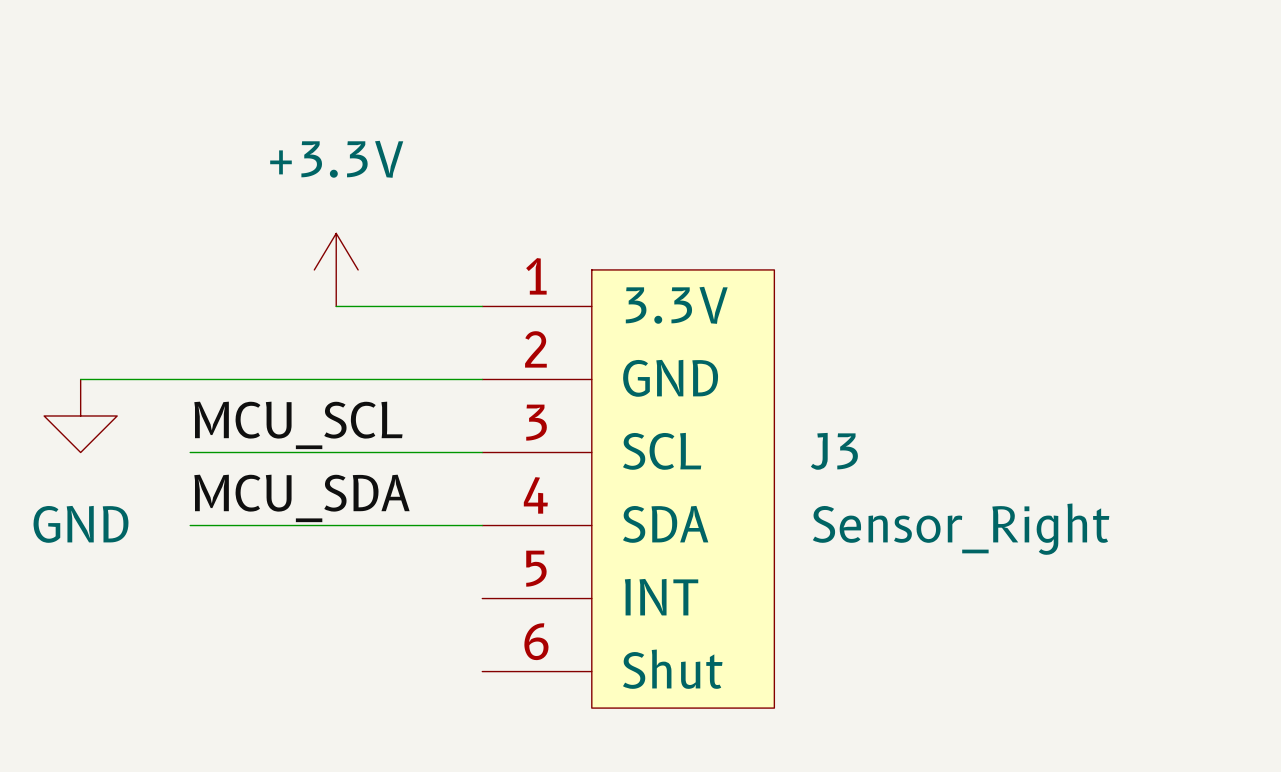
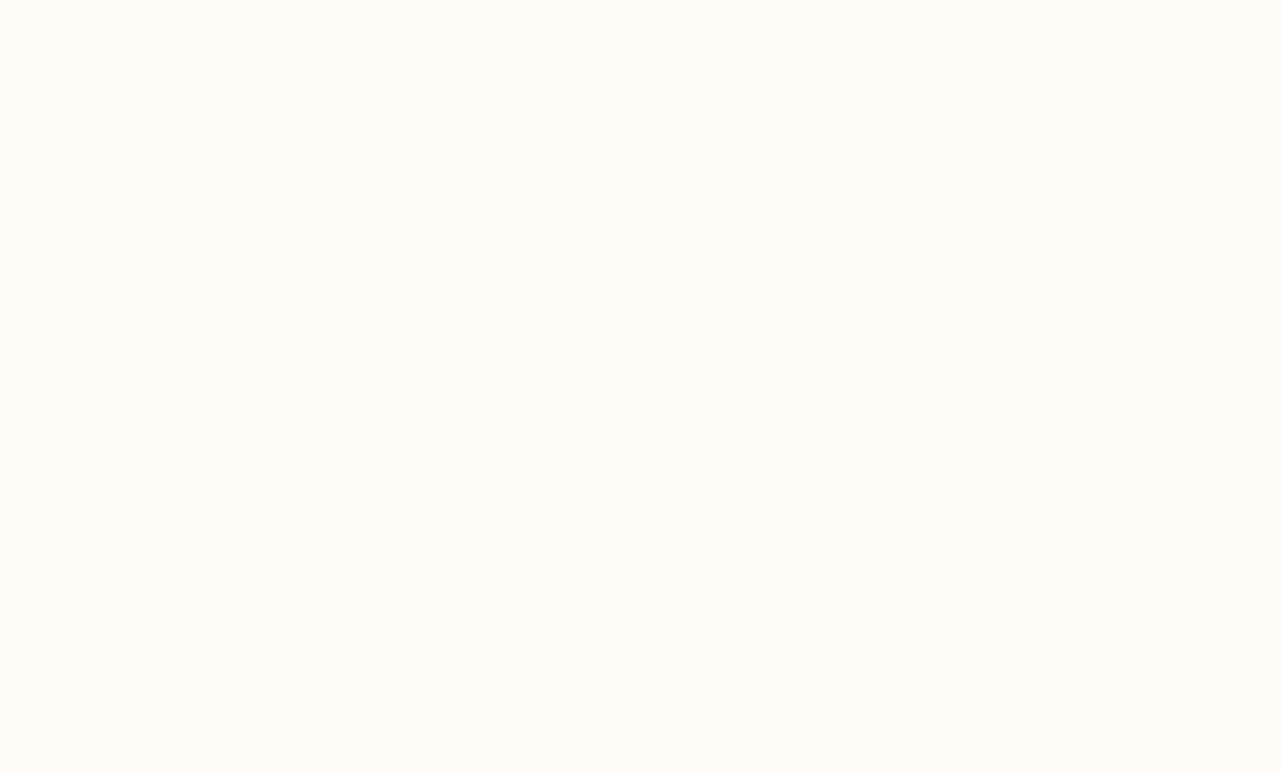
power symbol: +3.3V (336, 269) -> none
wire: (336, 306) (482, 306) -> none
wire: (80, 379) (482, 379) -> none
power symbol: GND (80, 415) -> none
label: MCU_SCL (298, 425) -> none
wire: (190, 452) (482, 452) -> none
J3: Sensor_Right (628, 489) -> none
label: MCU_SDA (301, 498) -> none
wire: (190, 525) (482, 525) -> none

